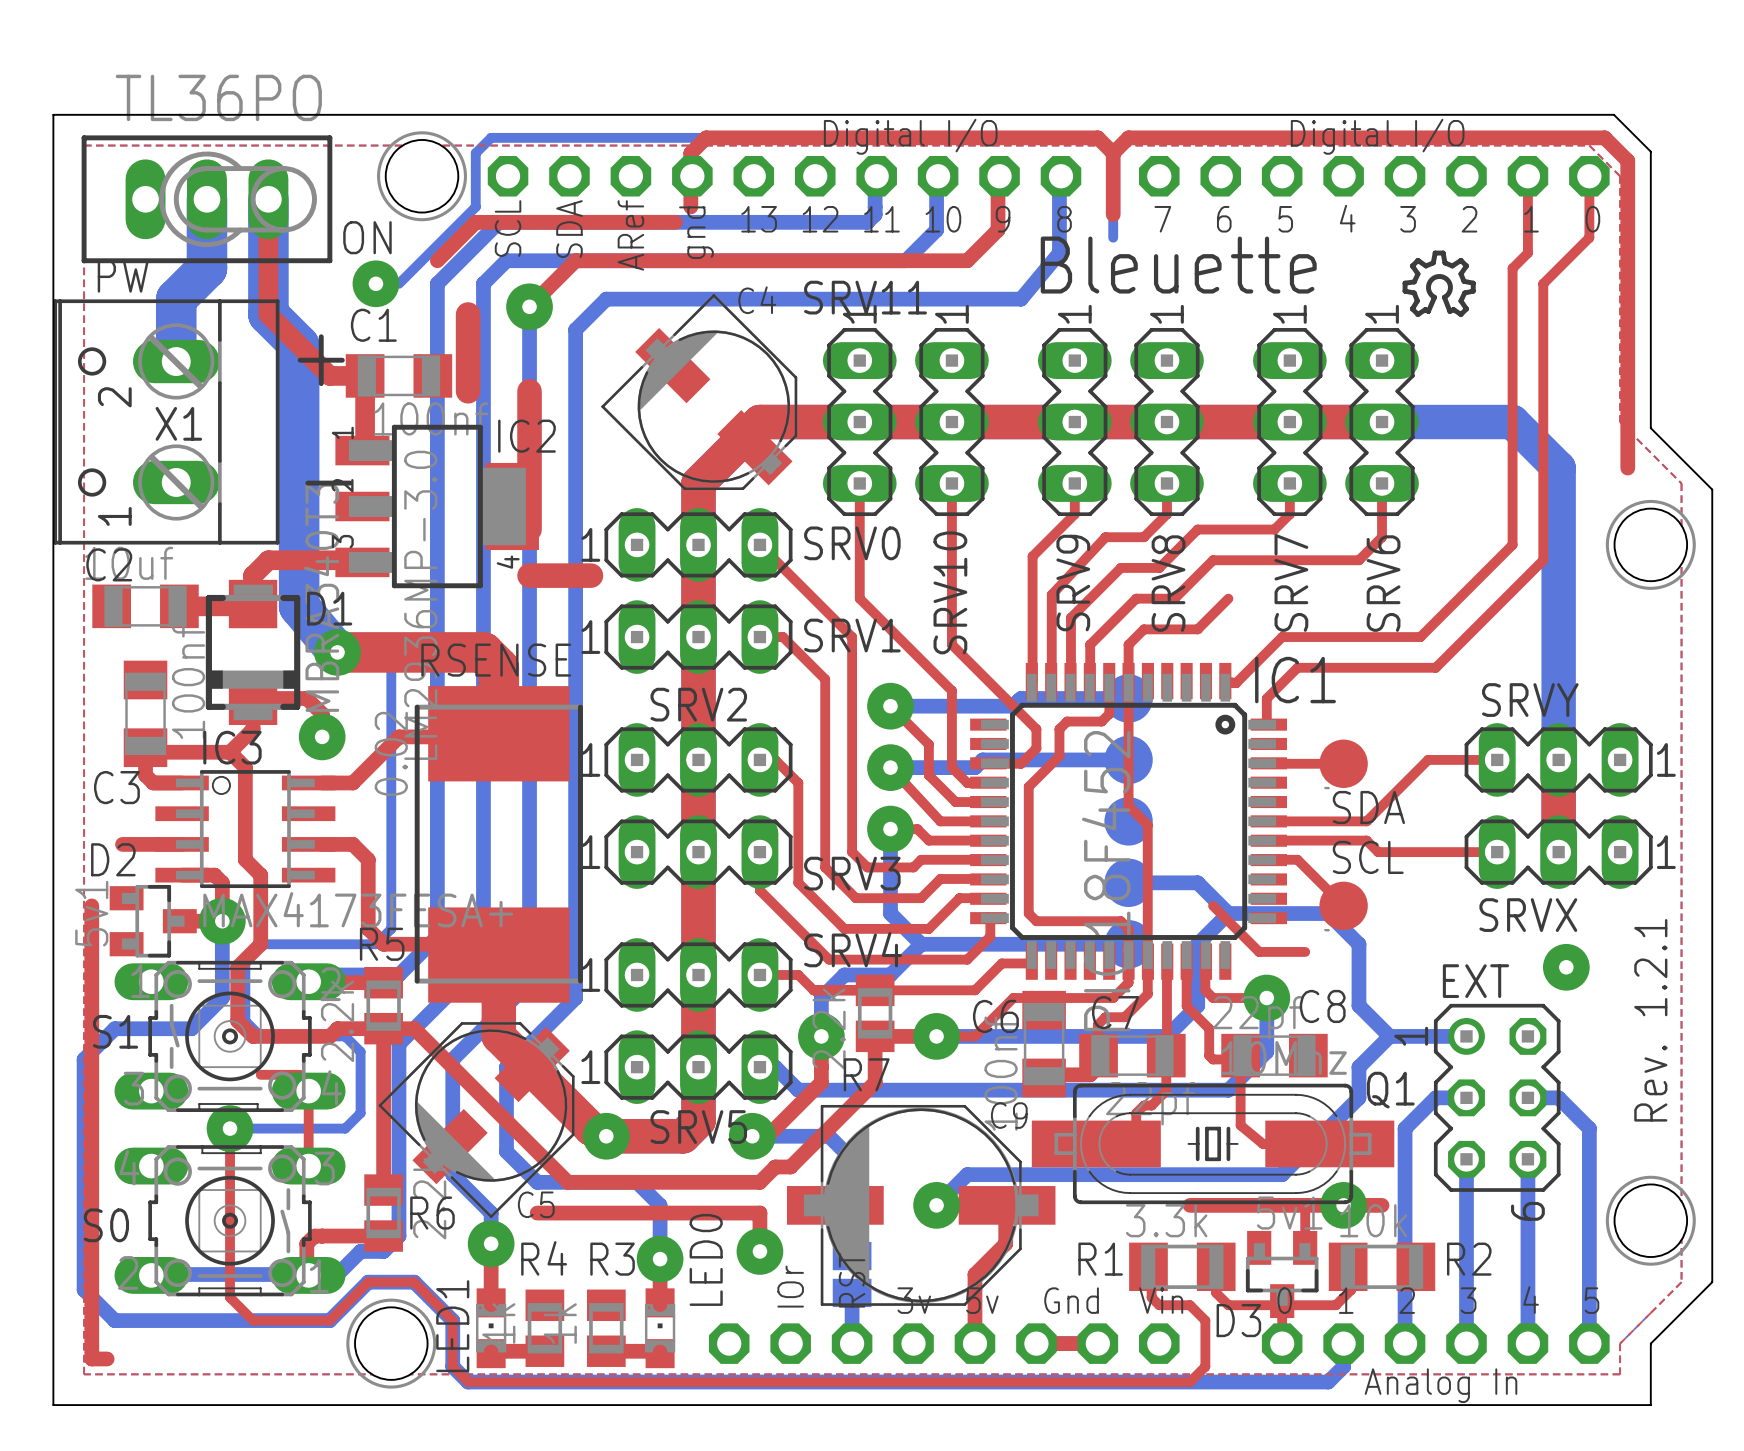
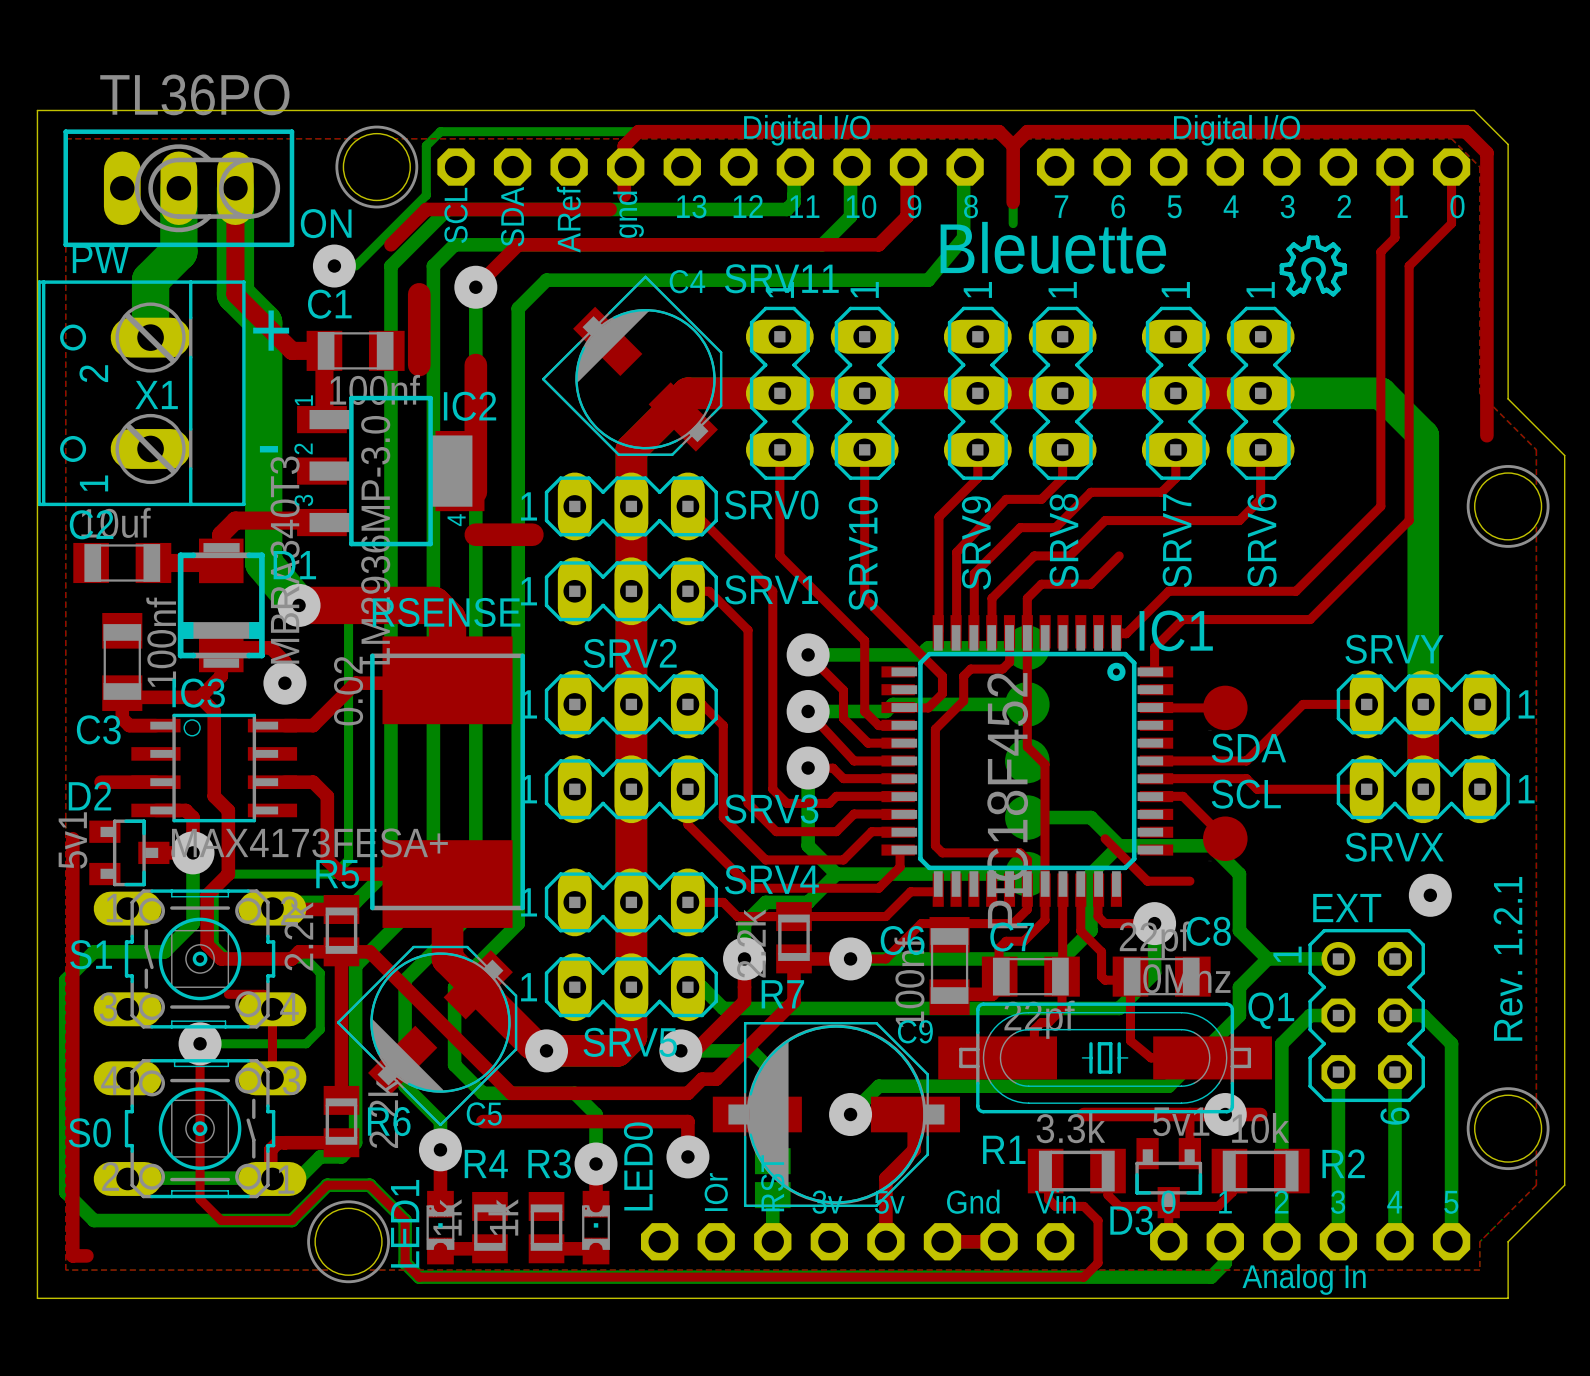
R1 name position: R1 (1100, 1259) -> R1 (1004, 1149)

